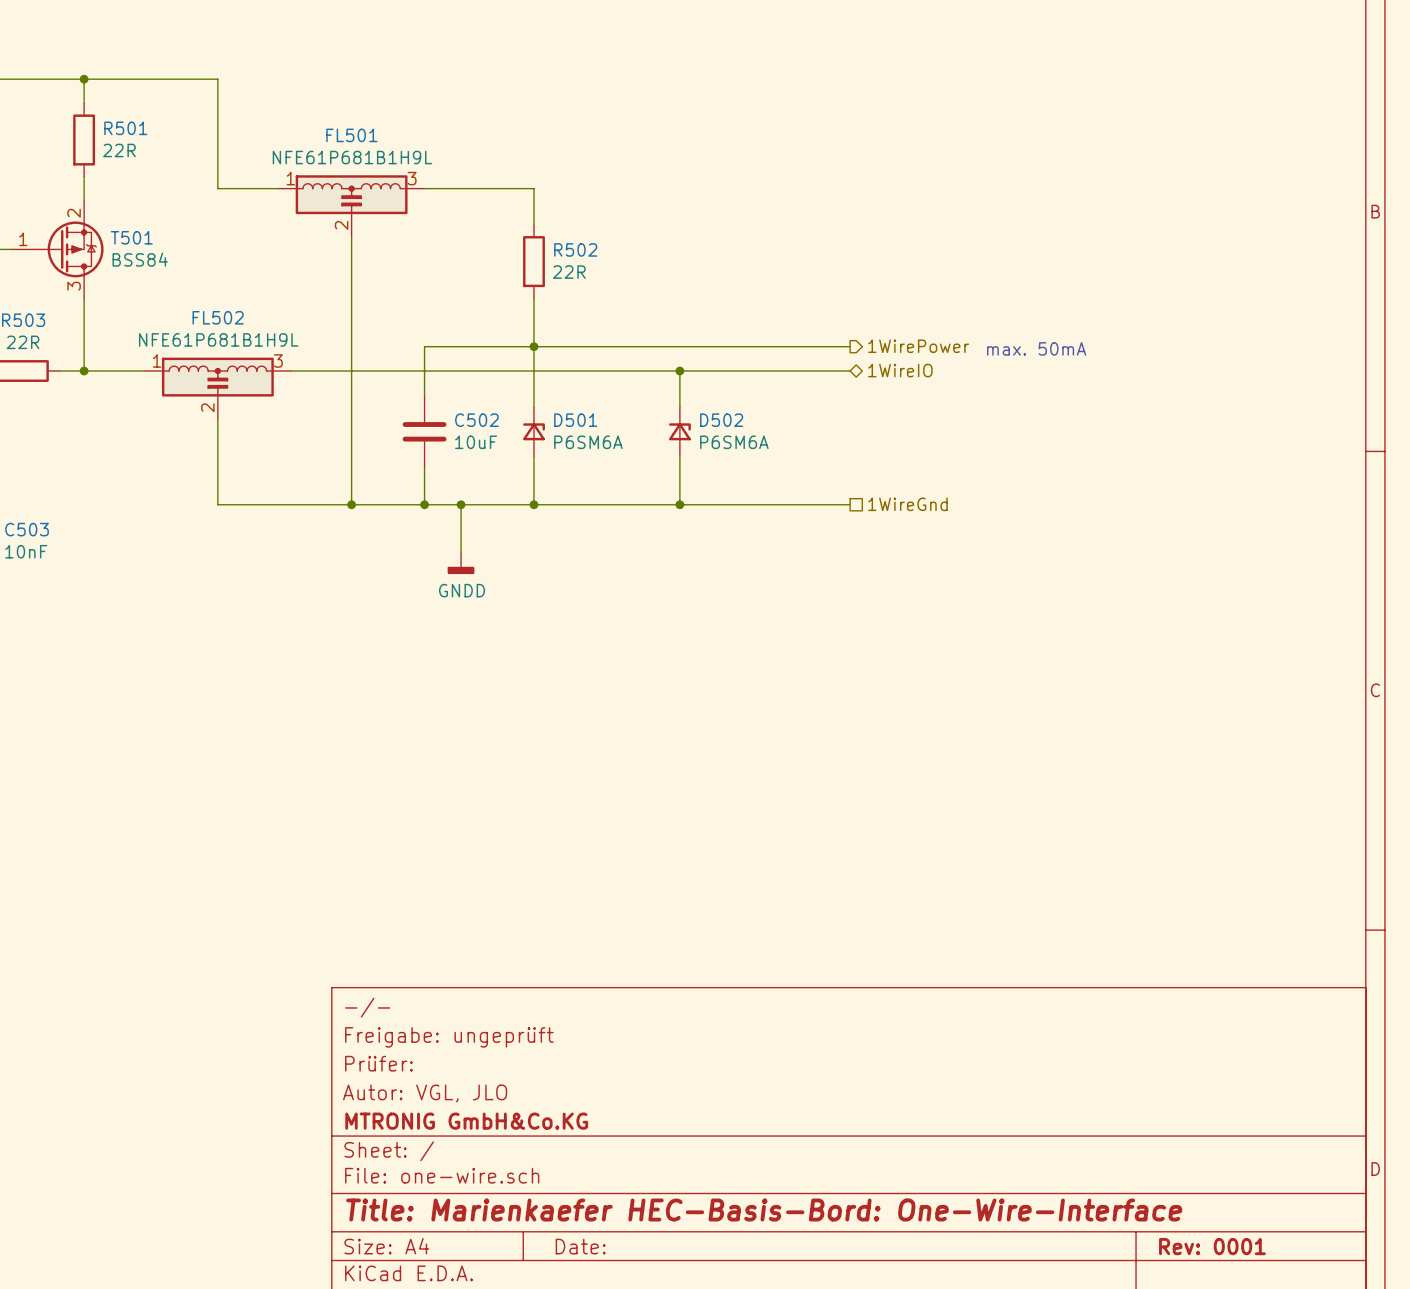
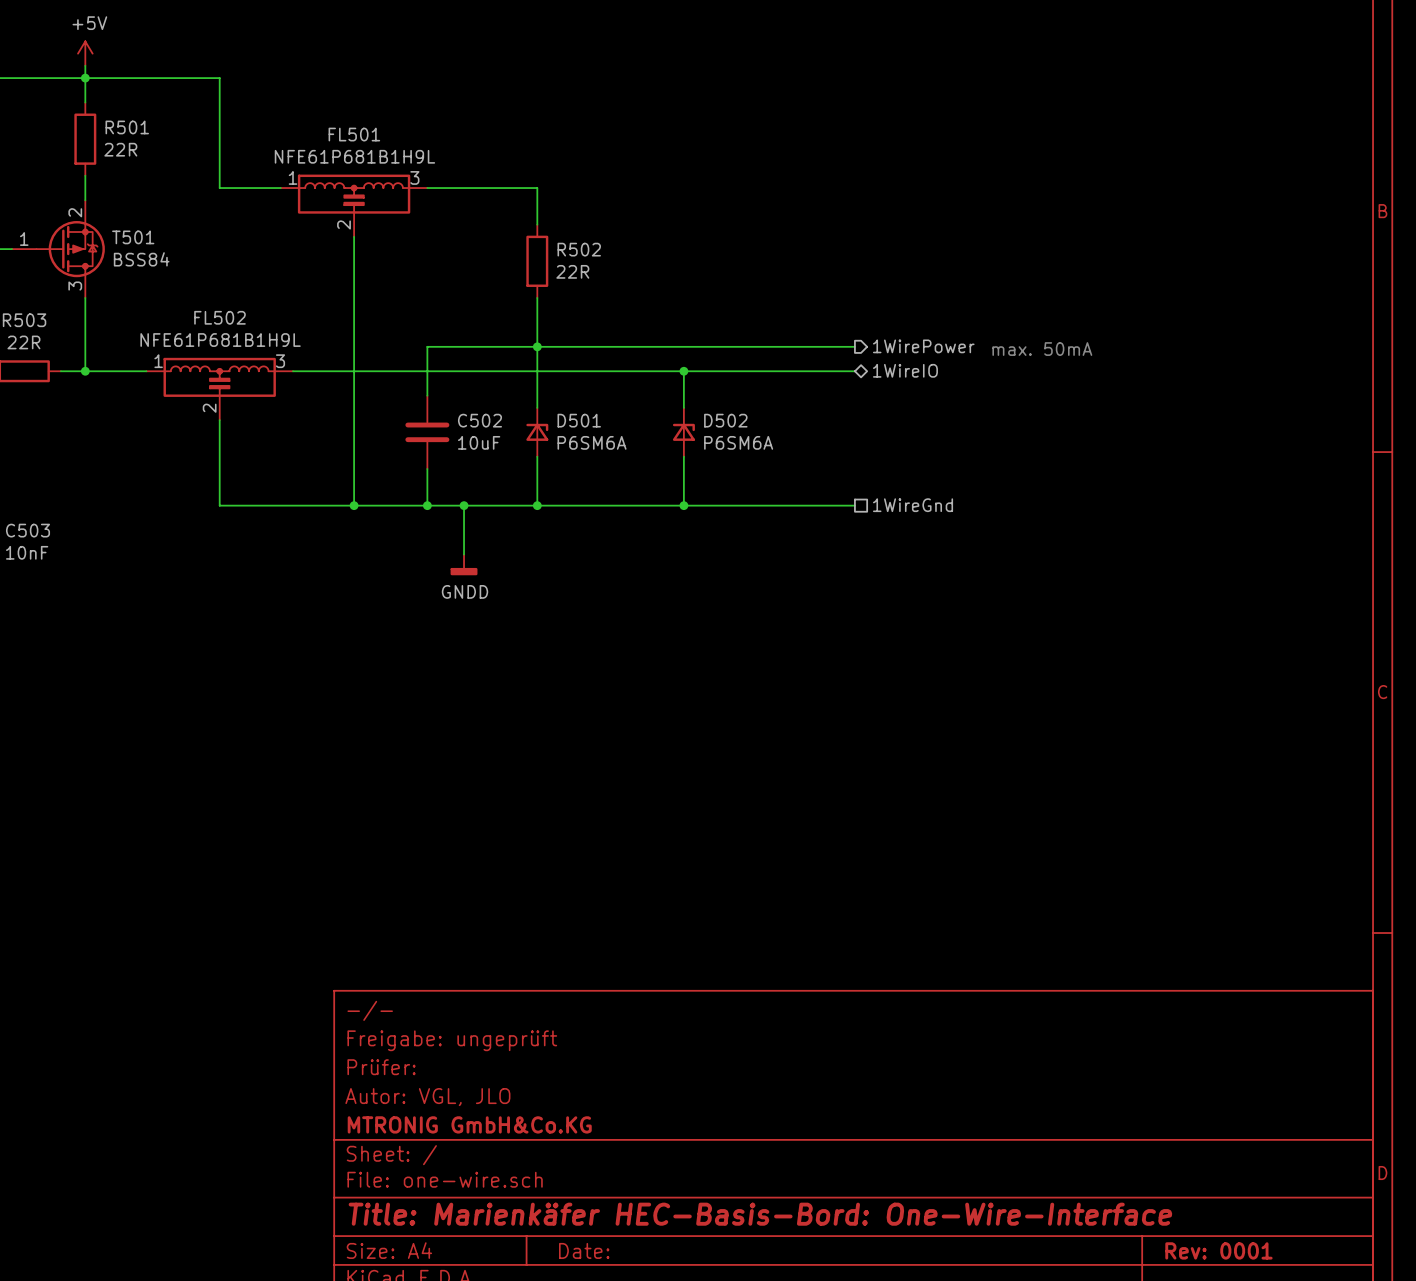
power symbol: none -> +5V (85, 53)
wire: none -> (85, 65) (85, 78)
title block: Title: Marienkaefer HEC-Basis-Bord: One-Wire-Interface (764, 1210) -> Title: Marienkäfer HEC-Basis-Bord: One-Wire-Interface (760, 1214)

